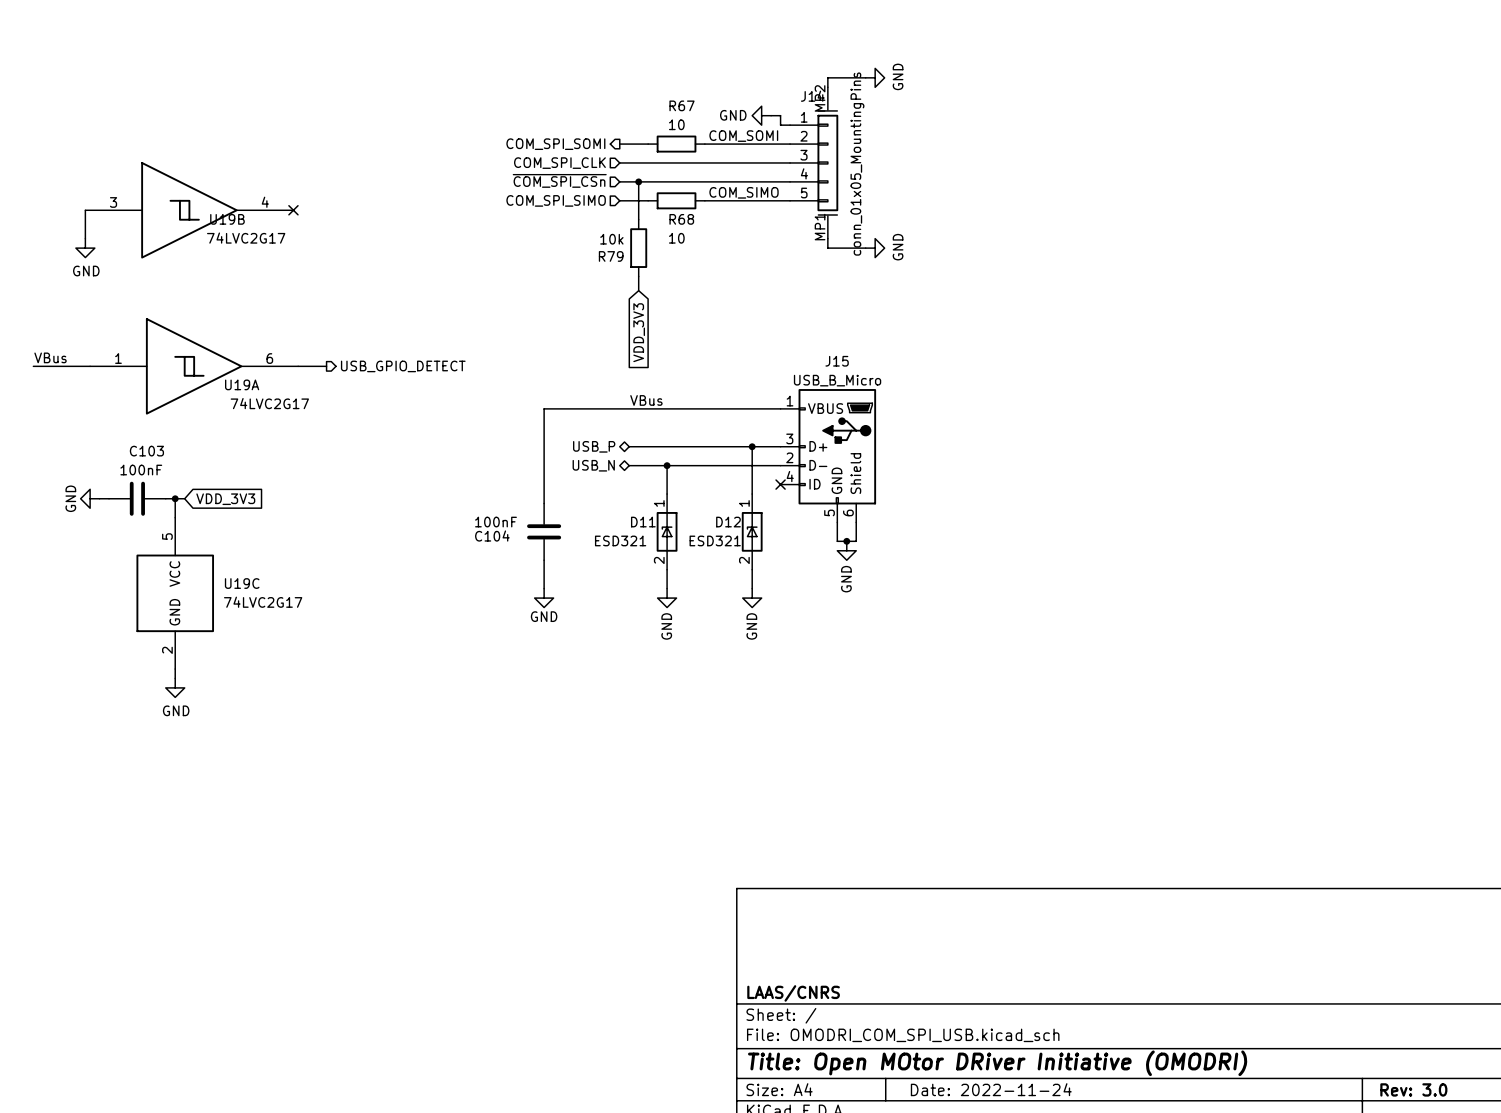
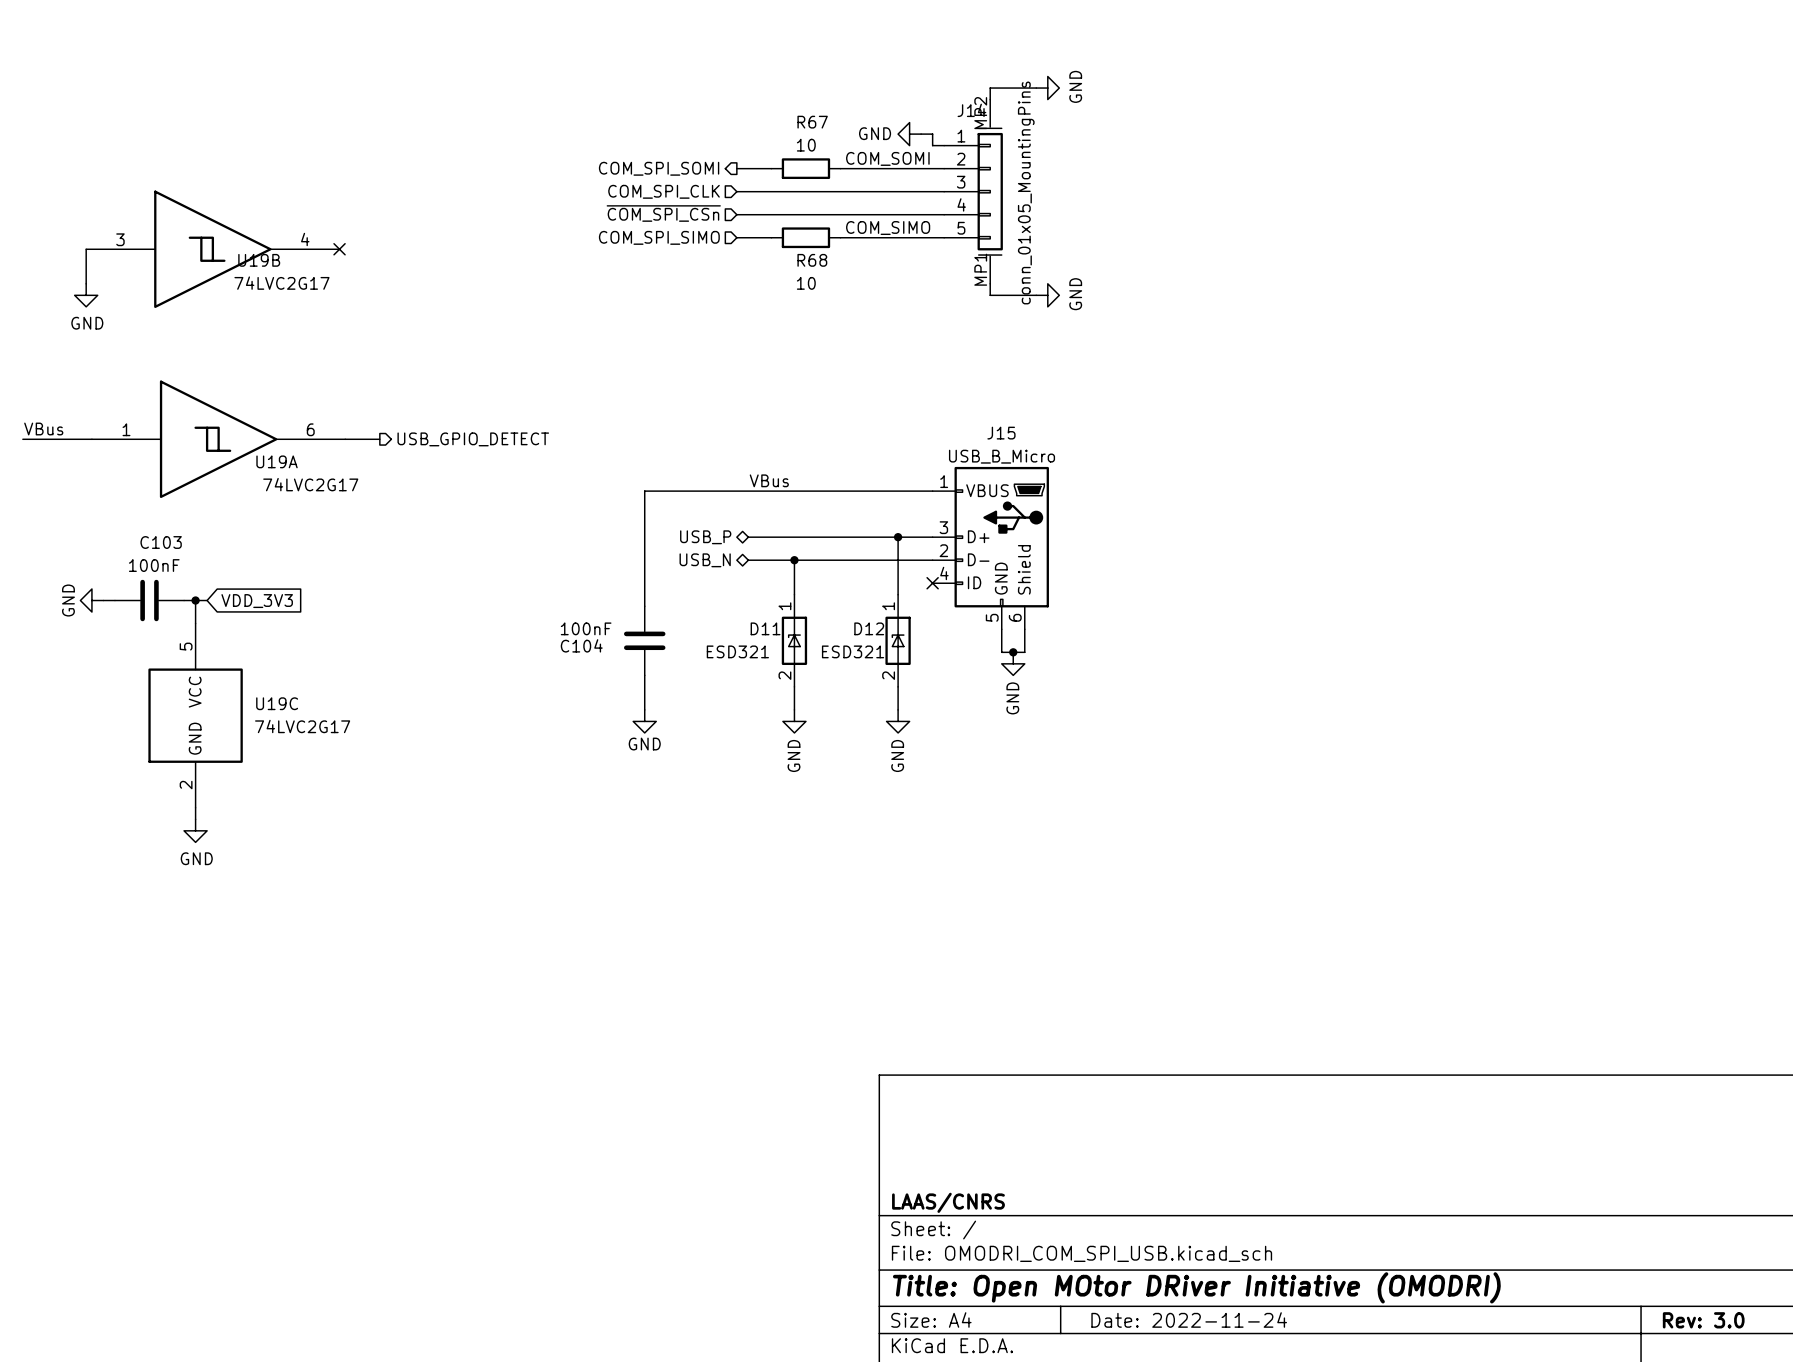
wire: (638, 181) (638, 219) -> none
junction: (638, 181) -> none
R79: 10k (638, 248) -> none
wire: (638, 276) (638, 290) -> none
global label: VDD_3V3 (639, 332) -> none

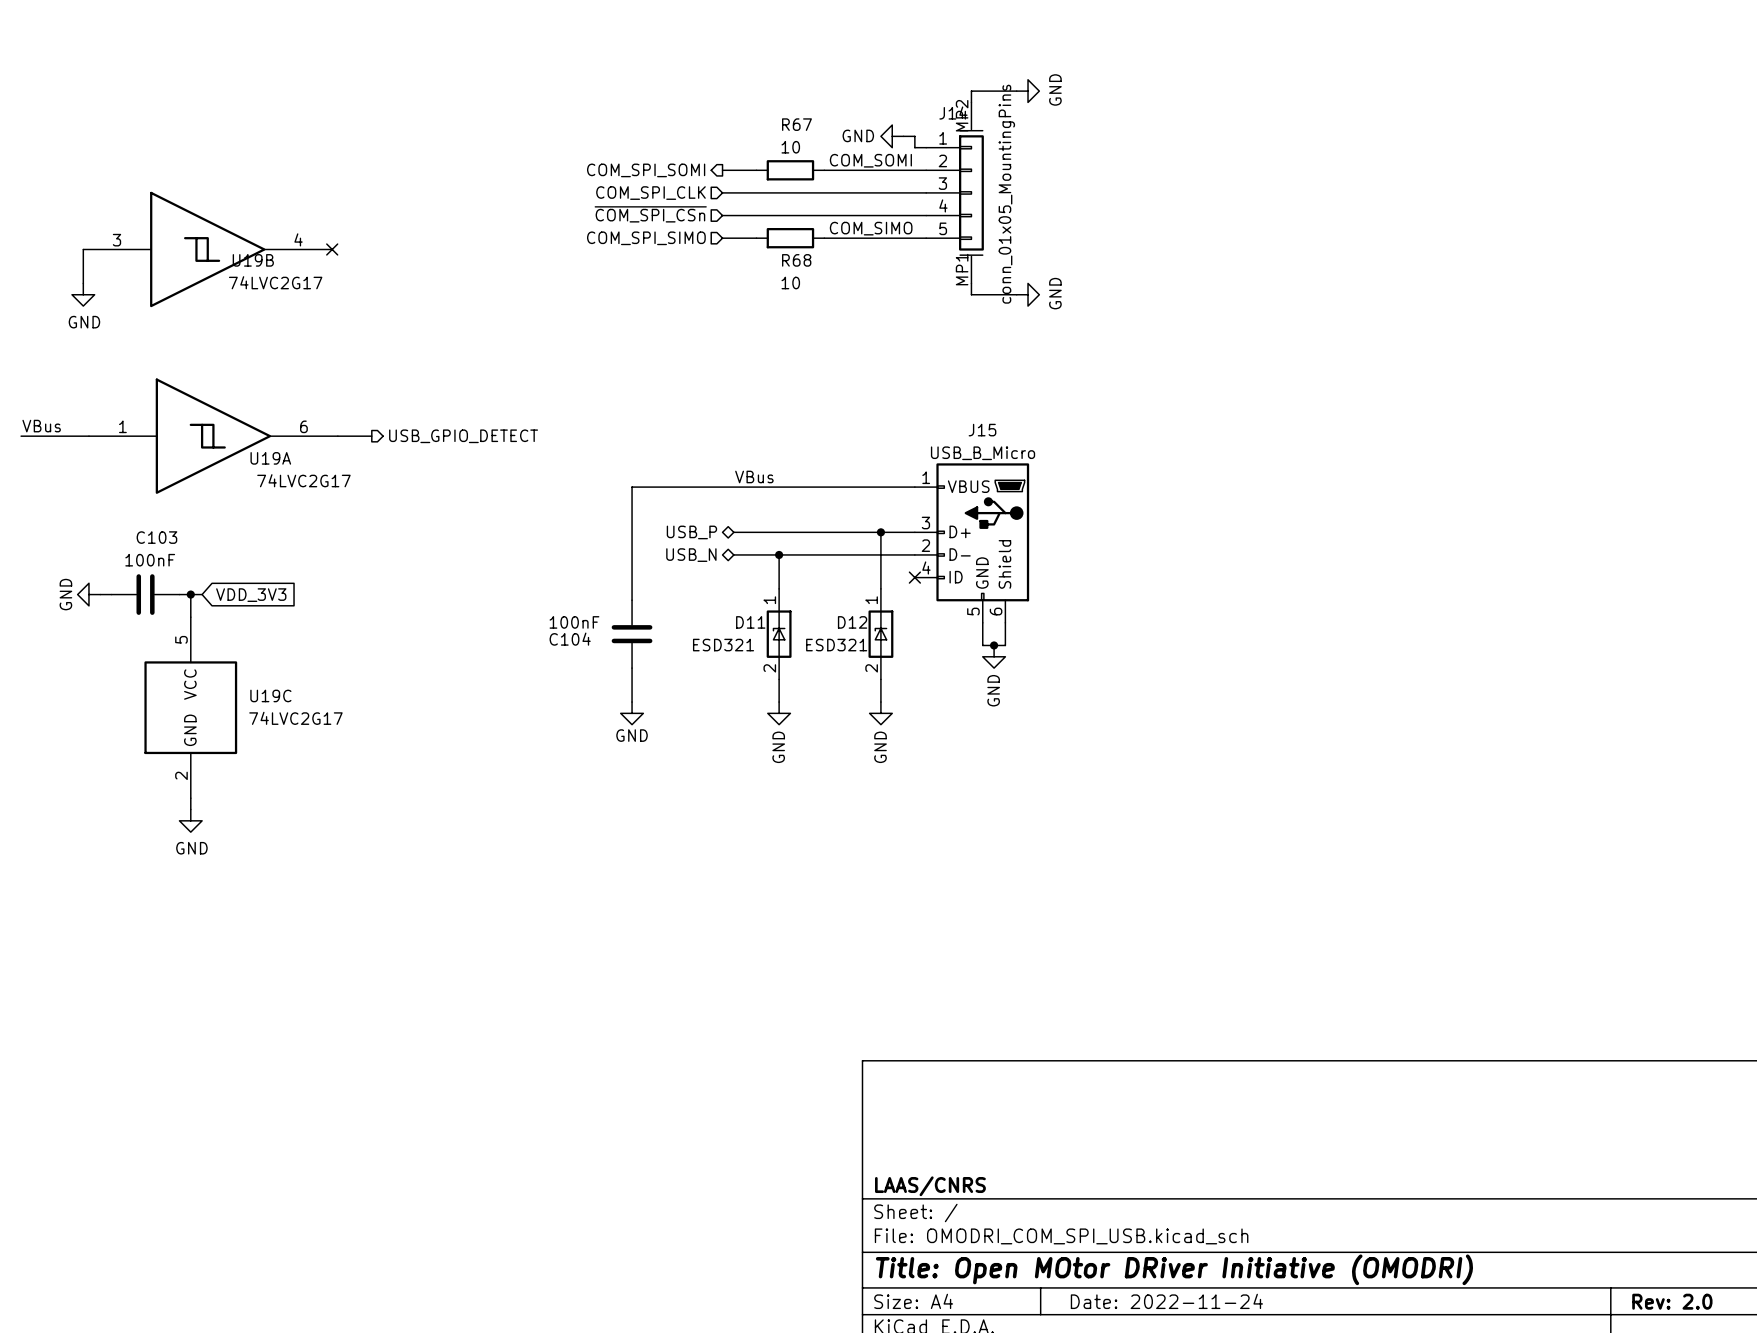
title block: Rev: 3.0 (1703, 1320) -> Rev: 2.0 (1672, 1301)

